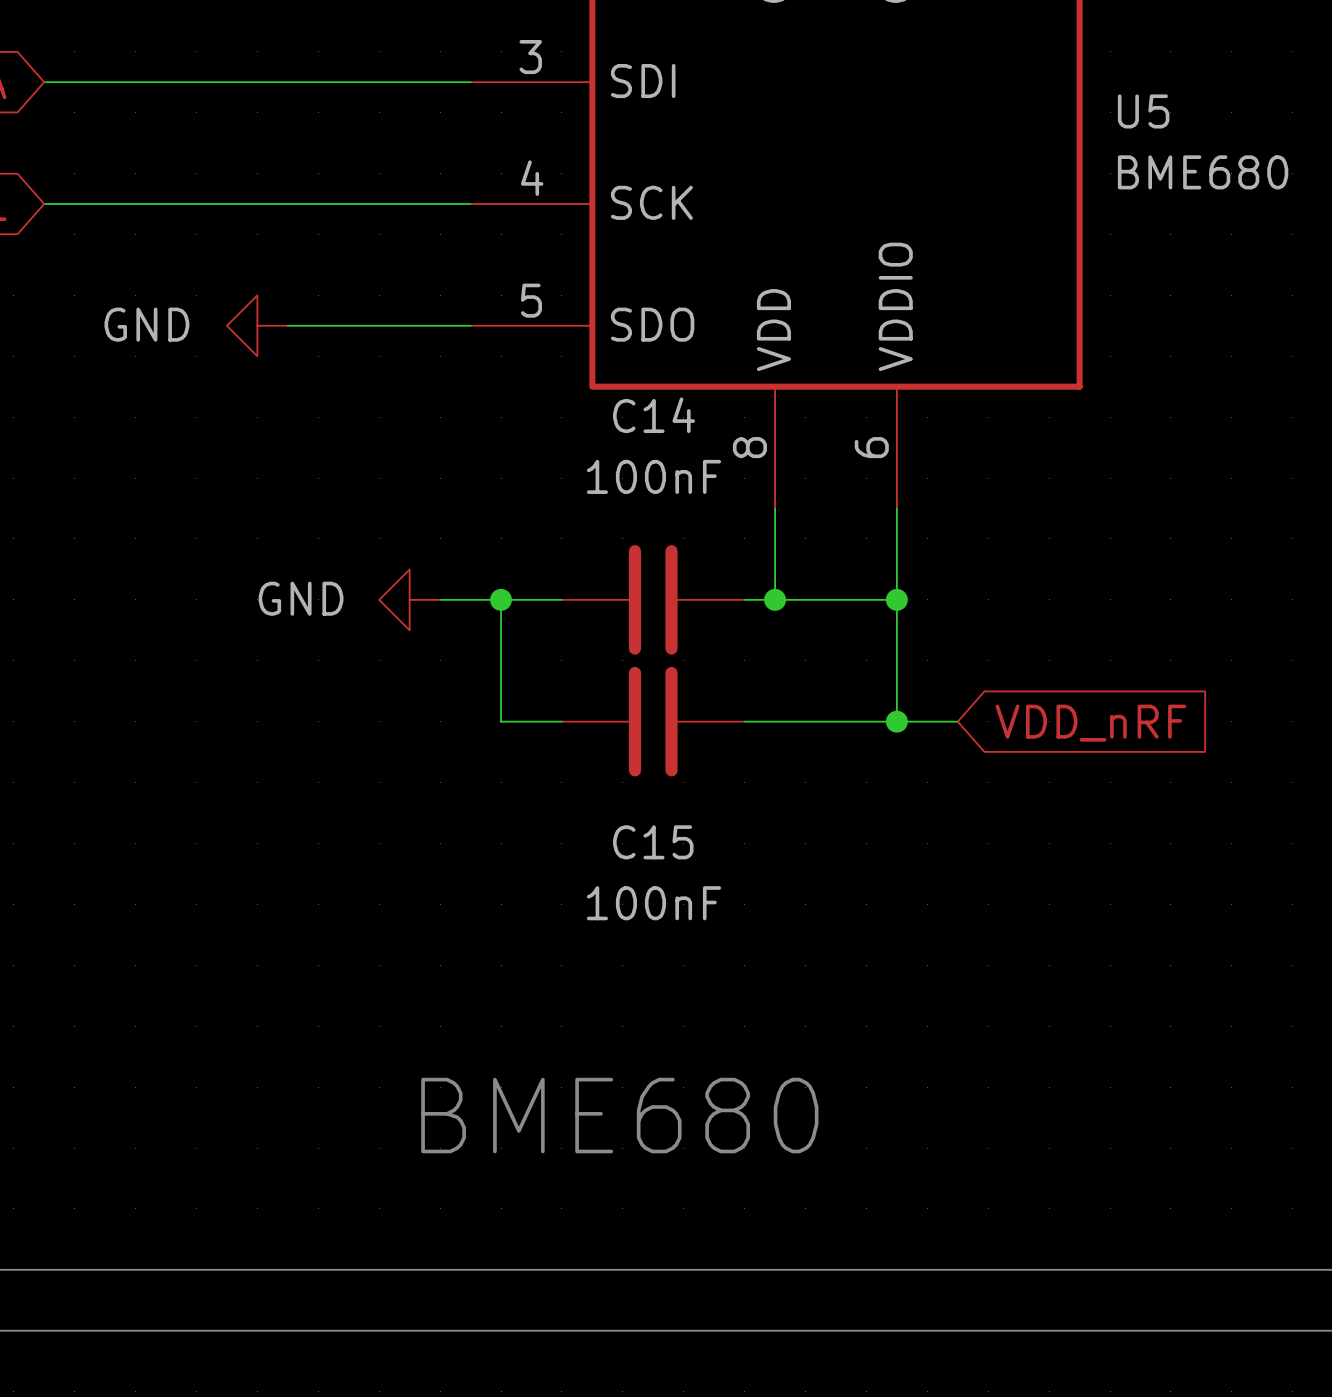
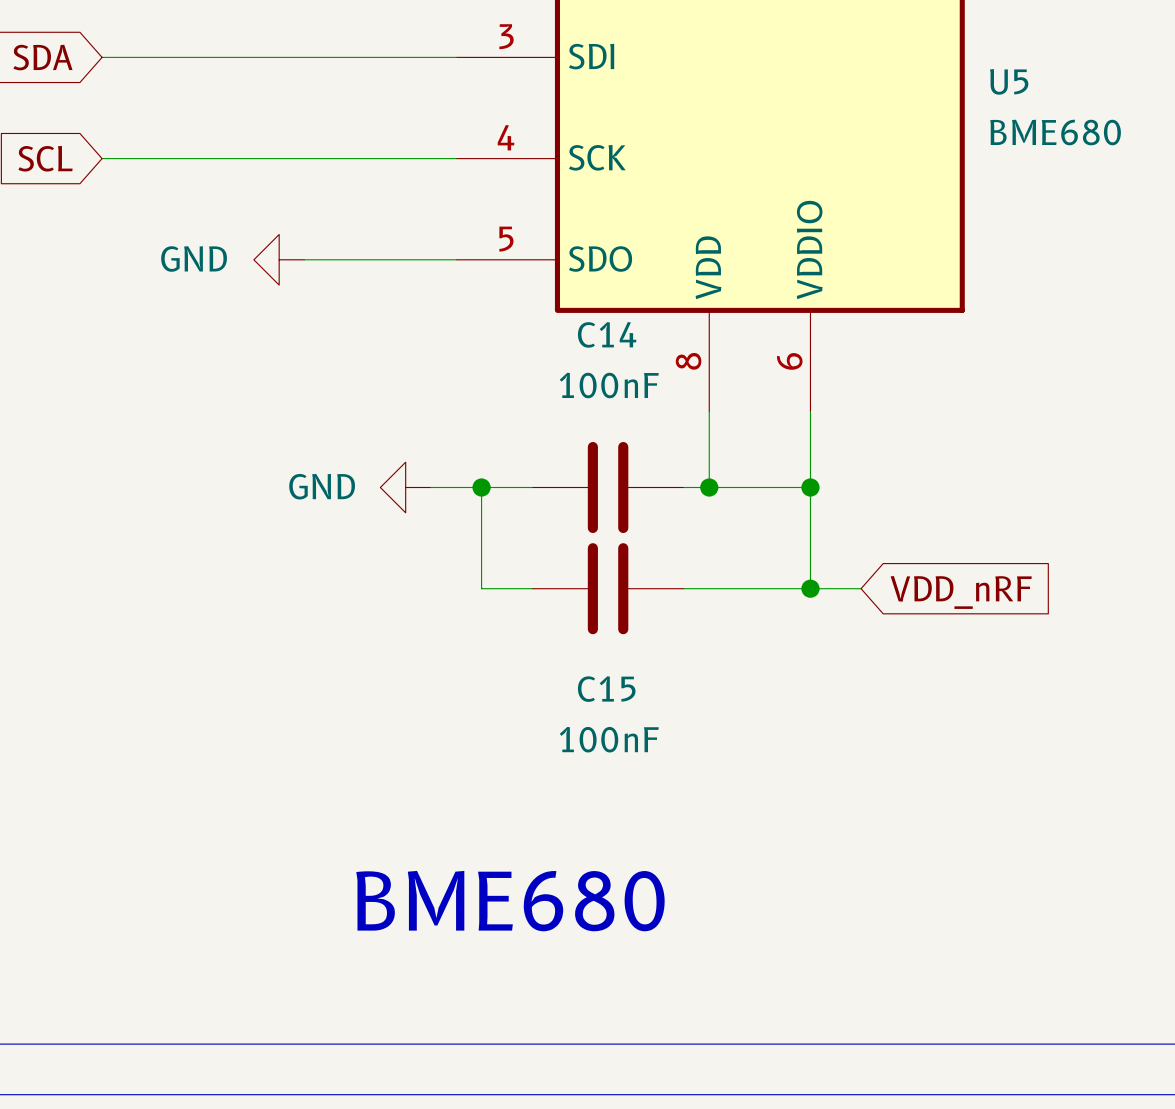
text position: BME680 (619, 1115) -> BME680 (510, 901)

